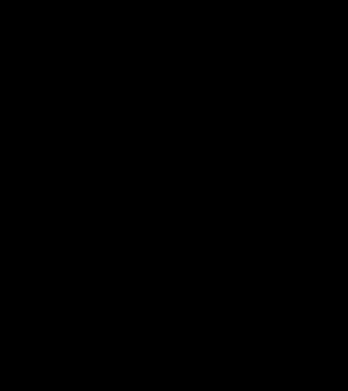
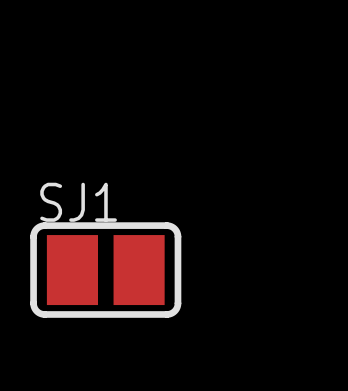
SJ1: none -> (105, 270)

